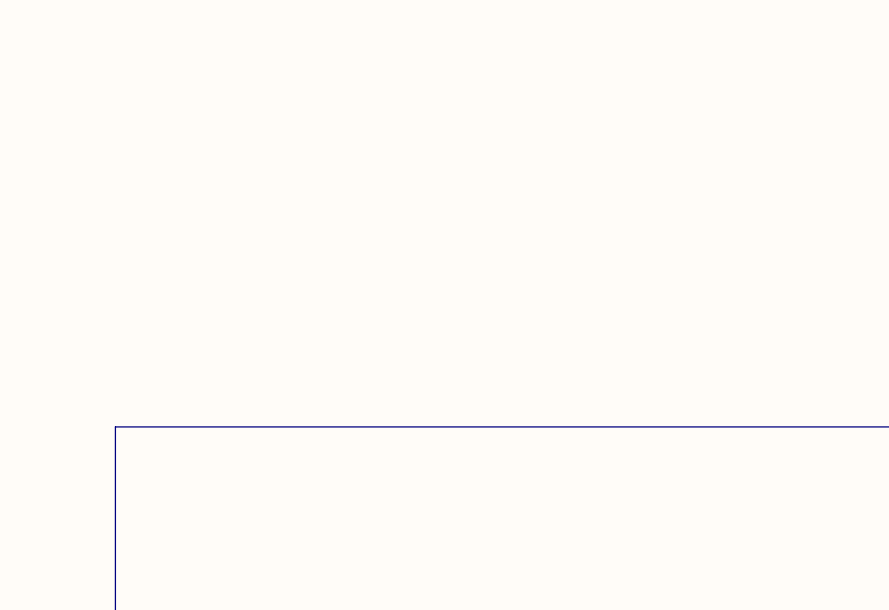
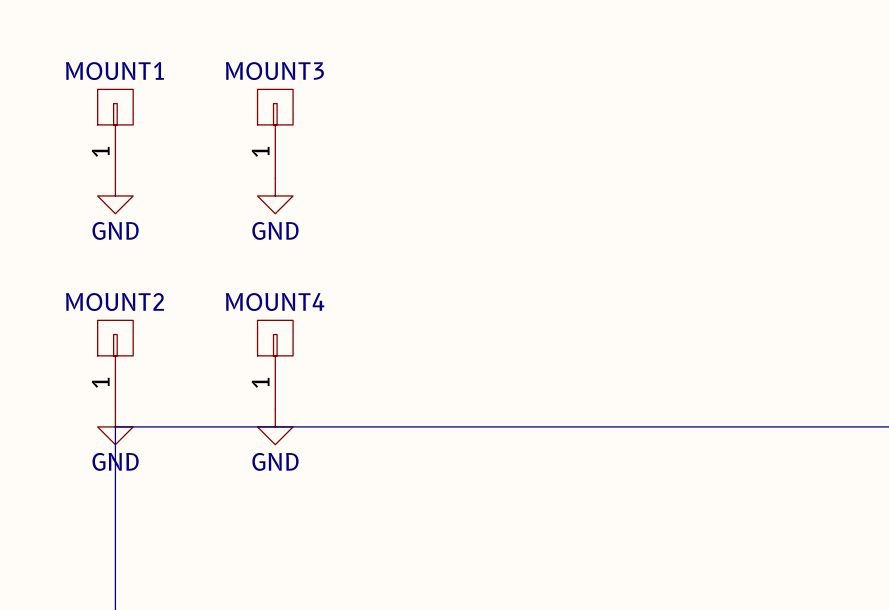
MOUNT1: none -> (115, 133)
MOUNT3: none -> (275, 133)
power symbol: none -> GND (115, 195)
power symbol: none -> GND (275, 195)
MOUNT2: none -> (115, 364)
MOUNT4: none -> (275, 364)
power symbol: none -> GND (115, 426)
power symbol: none -> GND (275, 426)

